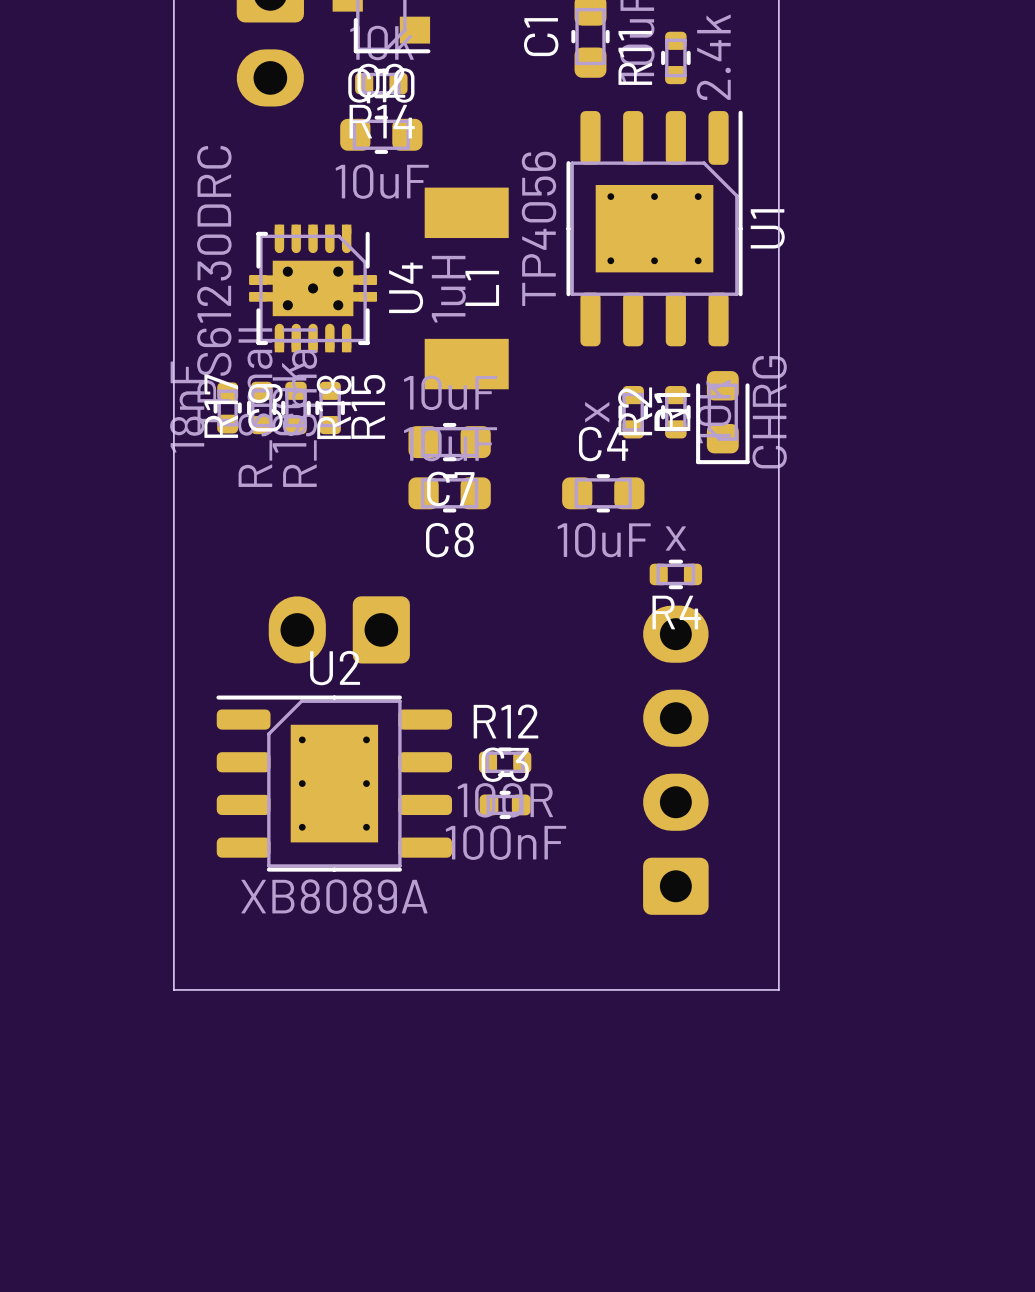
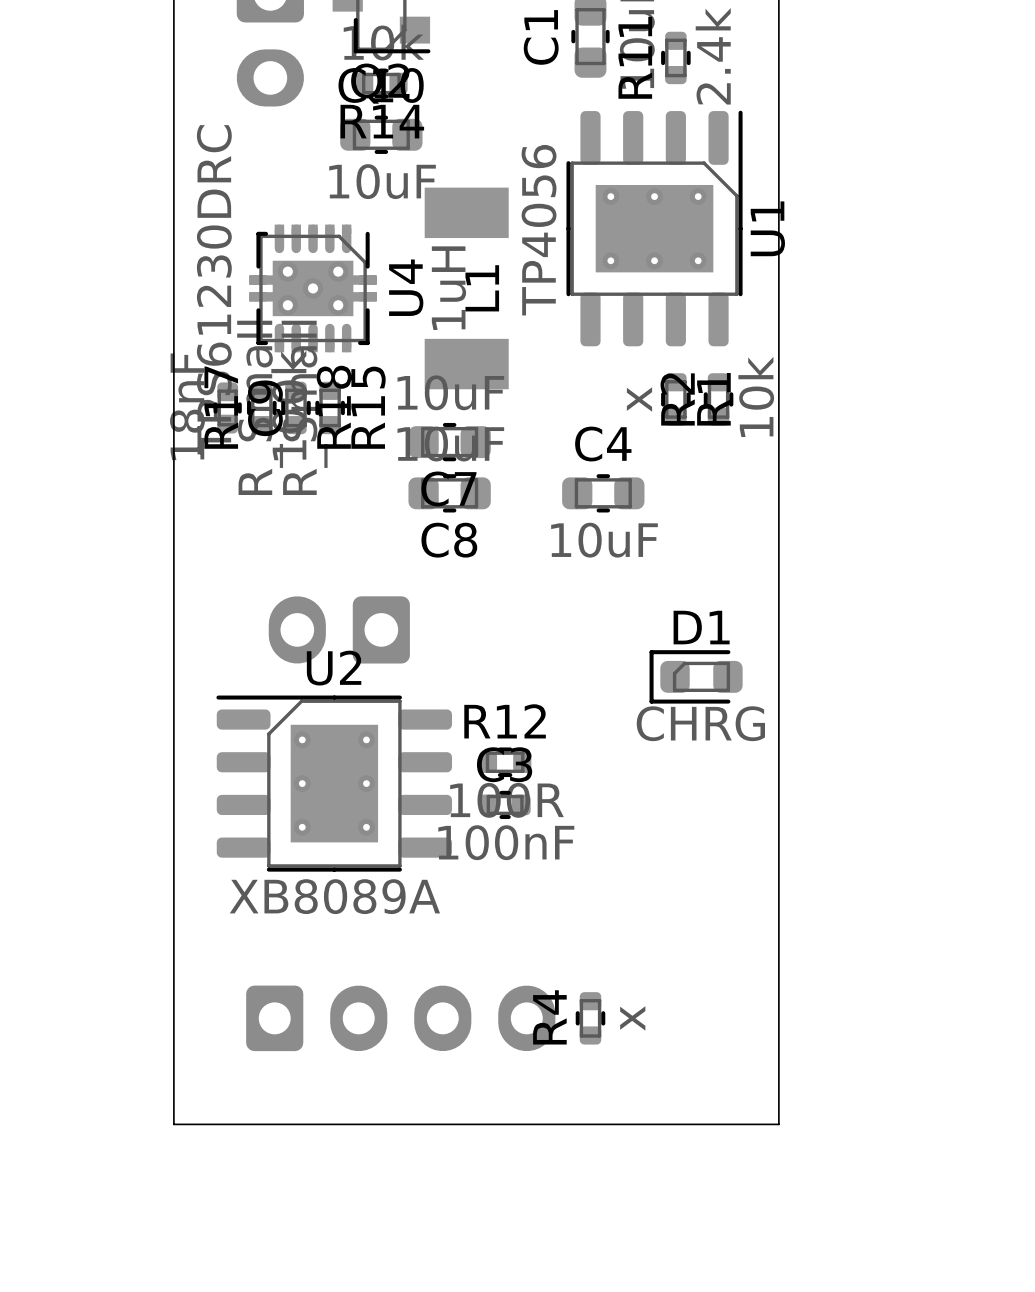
R1 position: (633, 412) -> (675, 399)
R2 position: (675, 412) -> (718, 399)
D1 rotation: 0° (722, 417) -> 90° clockwise (696, 676)
D1 position: (722, 417) -> (696, 676)
R4 rotation: 0° (675, 574) -> 90° clockwise (590, 1018)
R4 position: (675, 574) -> (590, 1018)
part rotation: 0° (675, 760) -> 90° clockwise (400, 1018)
part position: (675, 760) -> (400, 1018)
board edge: (173, 989) (778, 989) -> (173, 989) (173, 1124) (778, 1124) (778, 989)

